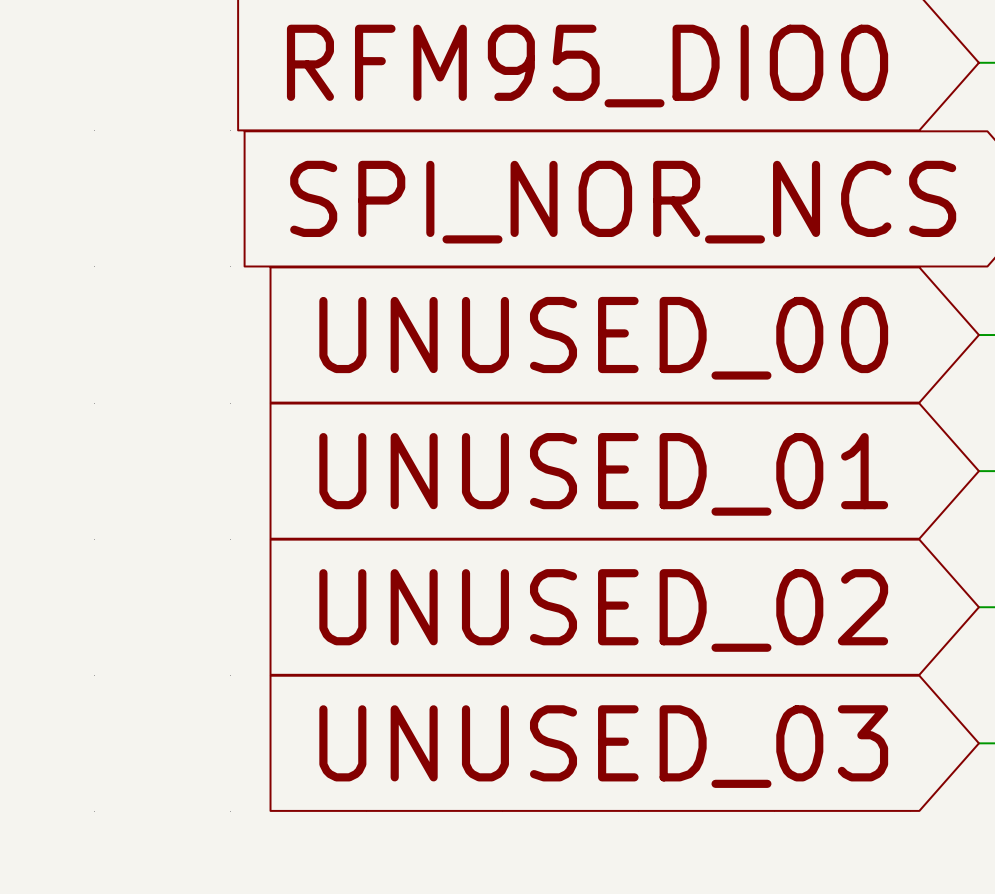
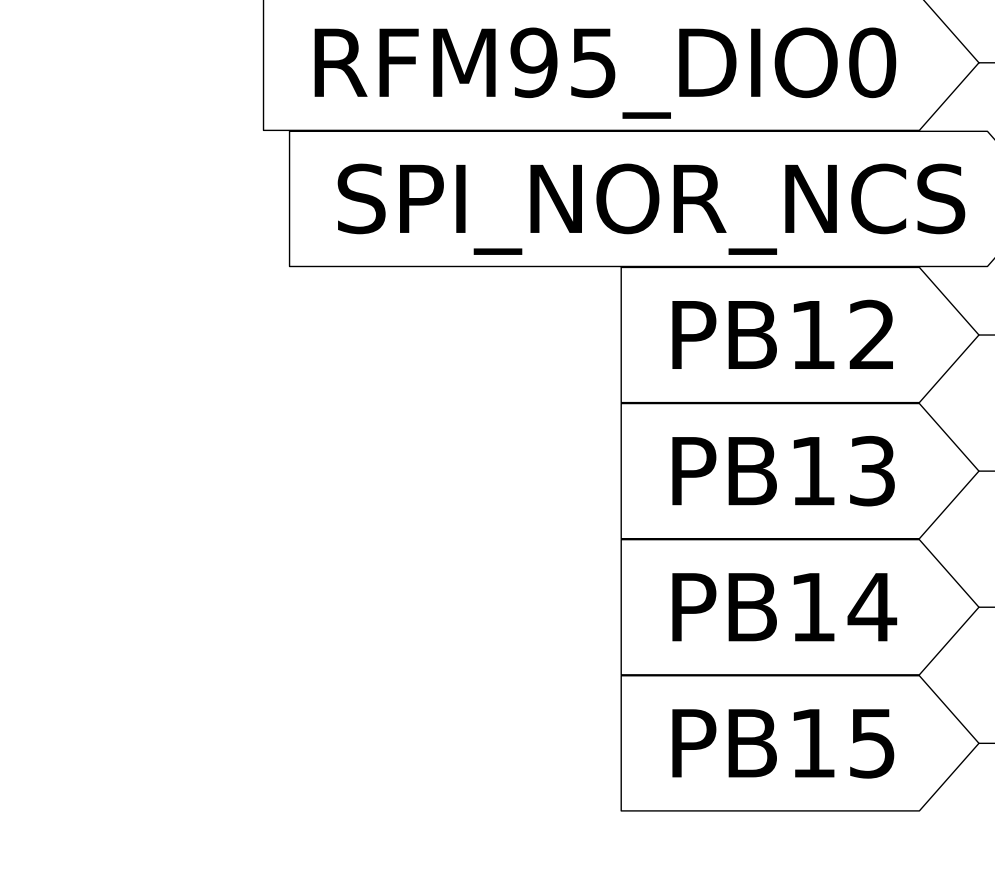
global label: UNUSED_00 (603, 338) -> PB12 (782, 334)
global label: UNUSED_01 (603, 474) -> PB13 (783, 471)
global label: UNUSED_02 (603, 610) -> PB14 (784, 607)
global label: UNUSED_03 (603, 746) -> PB15 (783, 744)

